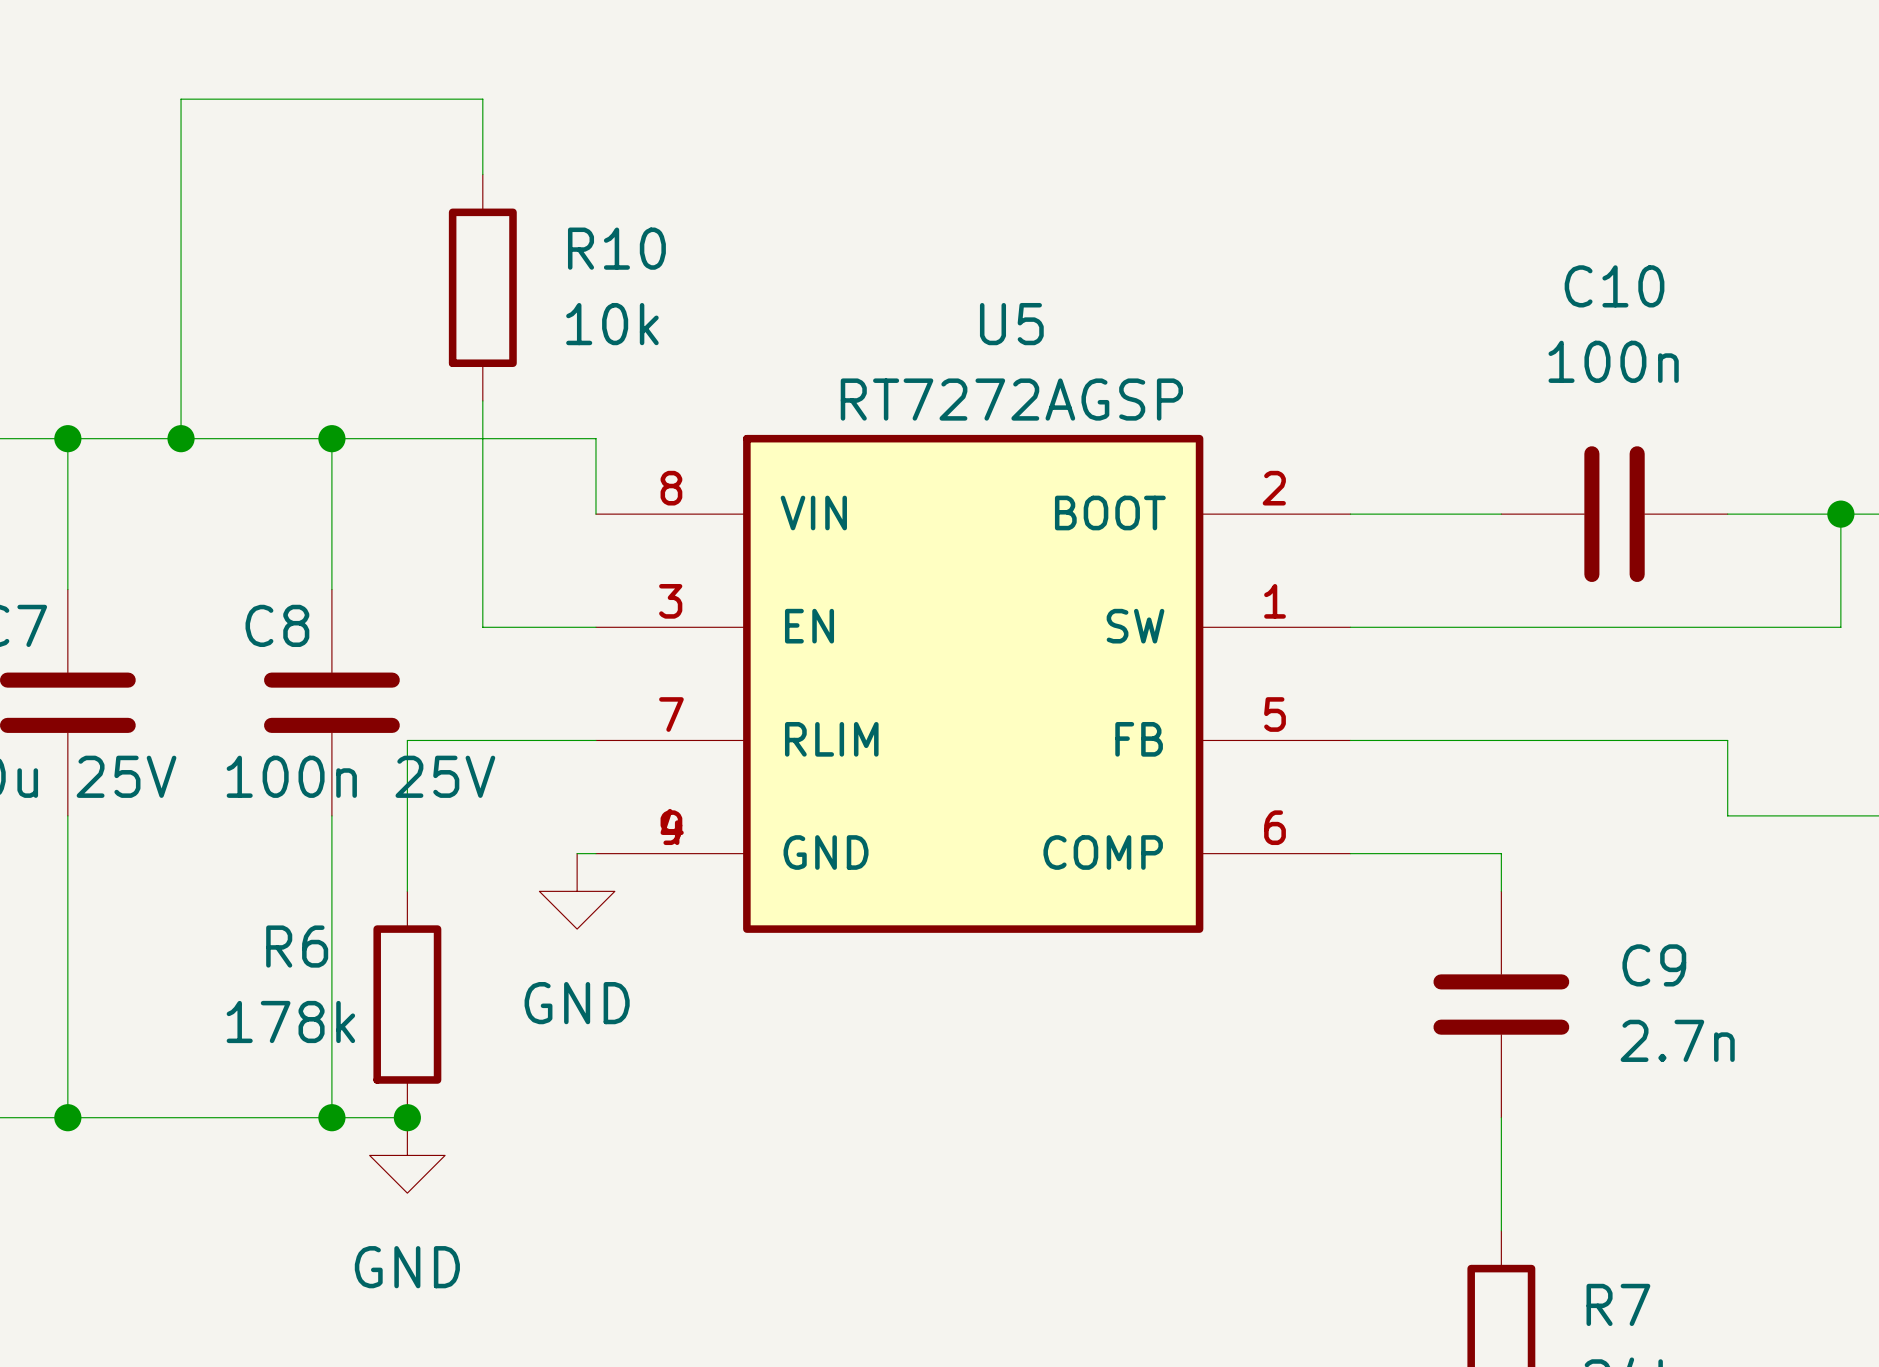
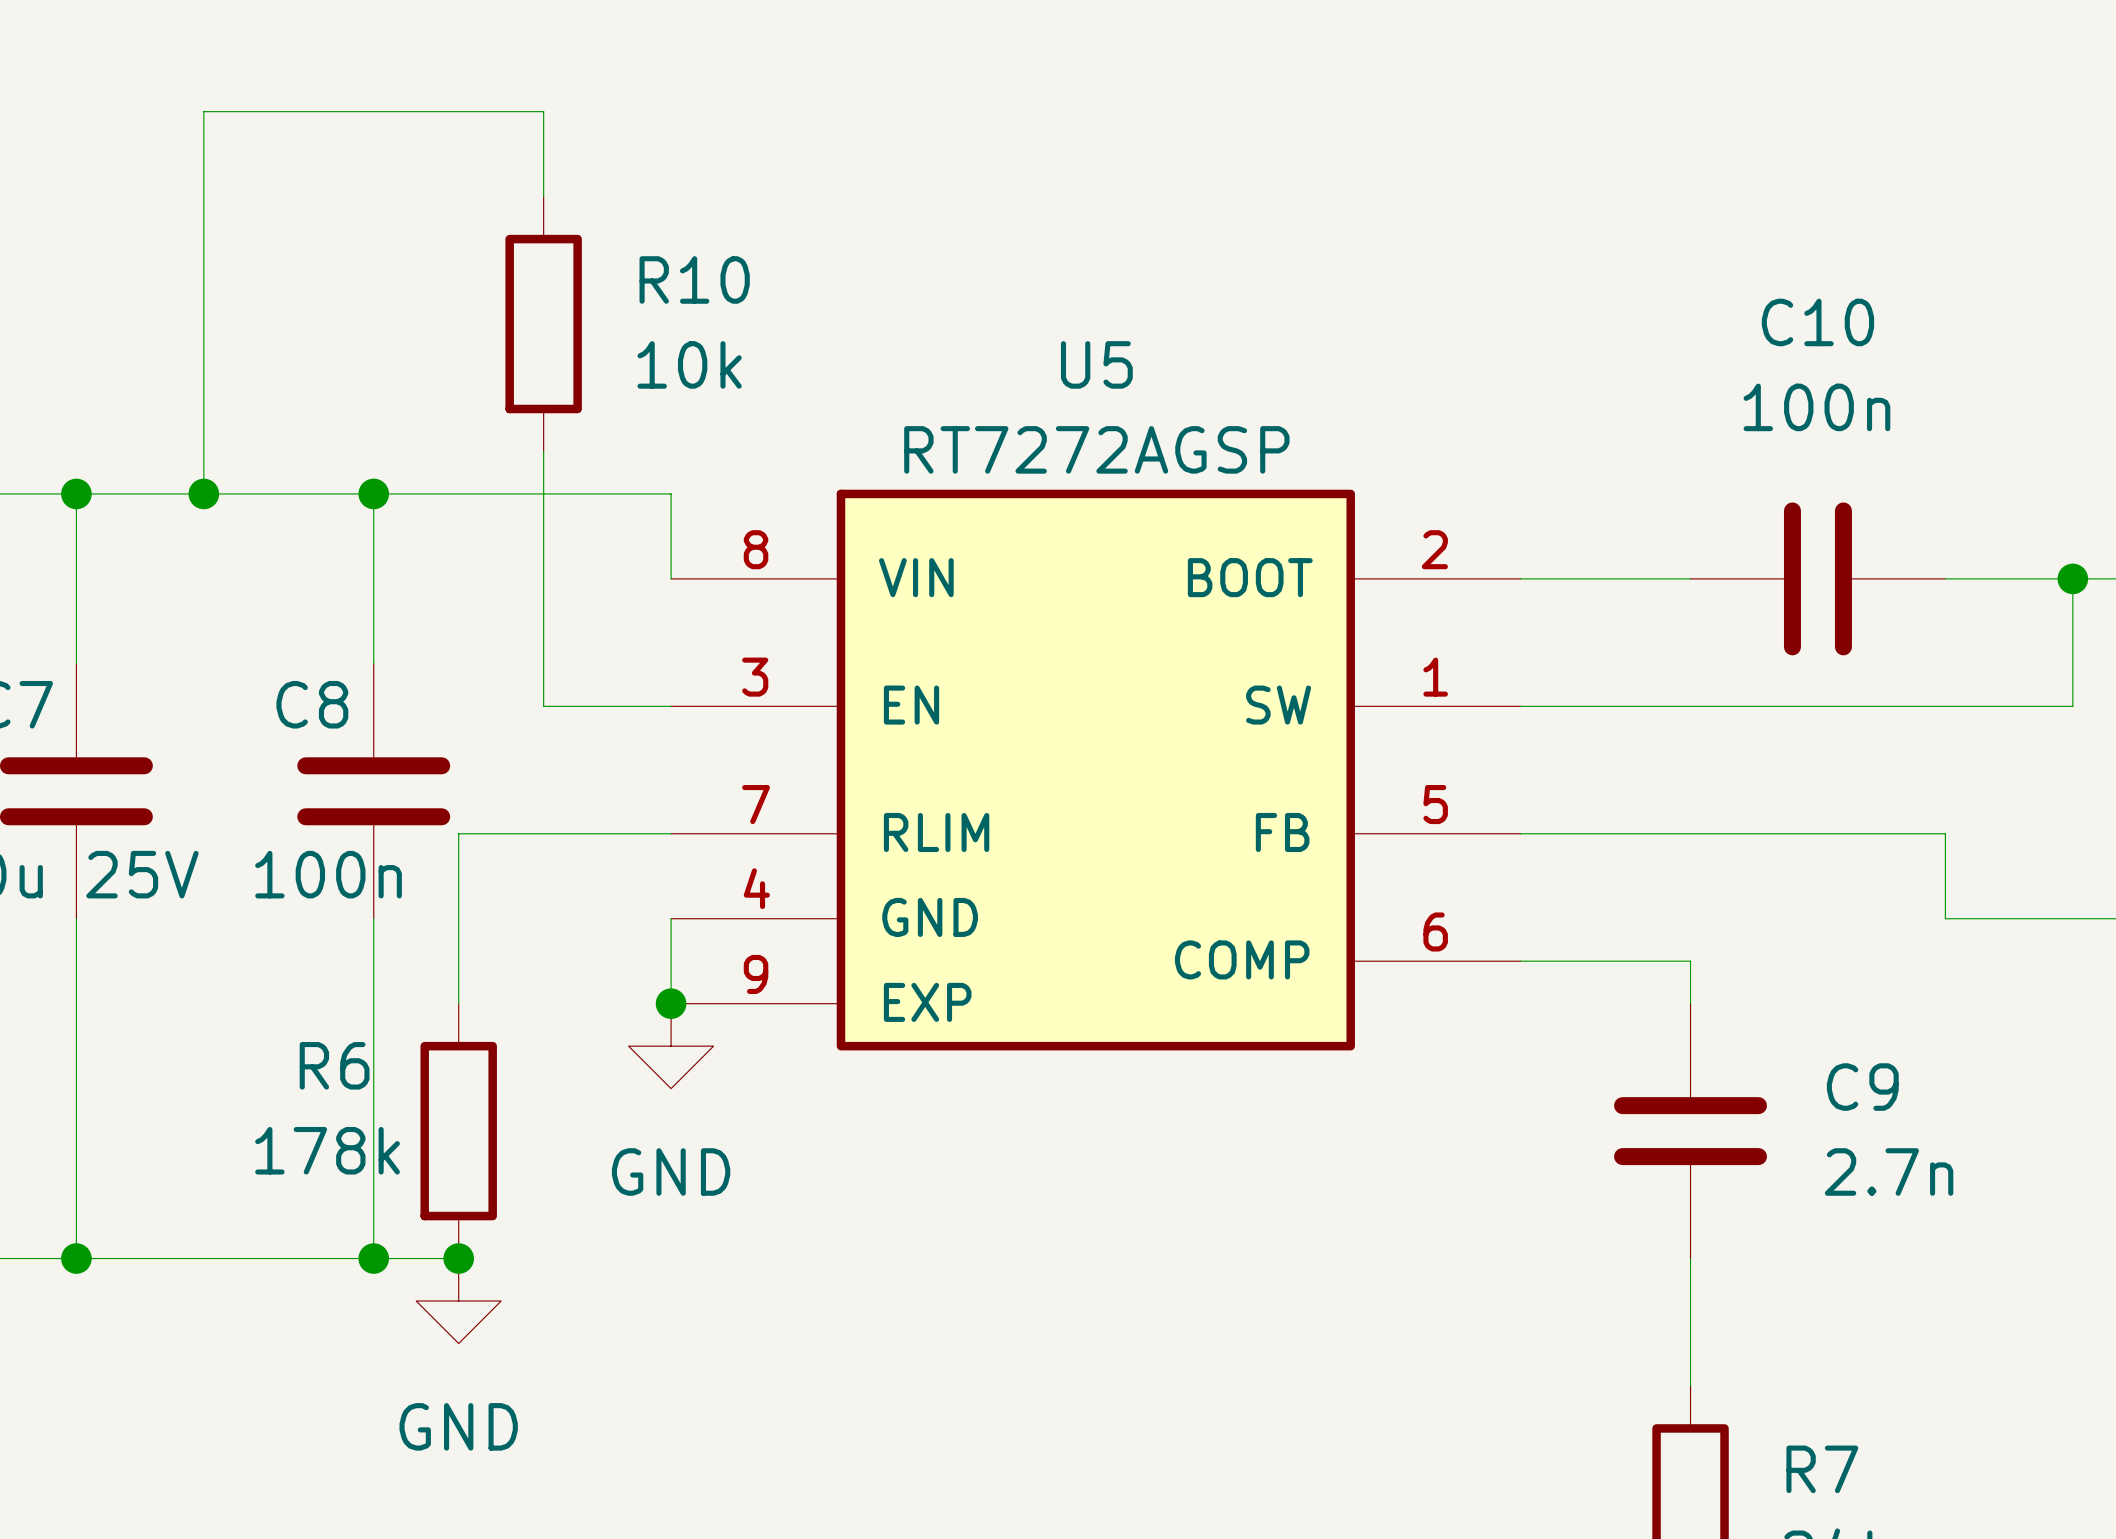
U5 symbol: [595, 434, 1351, 933] -> [671, 489, 1521, 1051]
C8 value: 100n 25V (360, 776) -> 100n (328, 874)
wire: none -> (671, 918) (671, 1003)
wire: (577, 853) (595, 853) -> none
power symbol position: GND (577, 891) -> GND (671, 1046)
junction: none -> (671, 1003)

